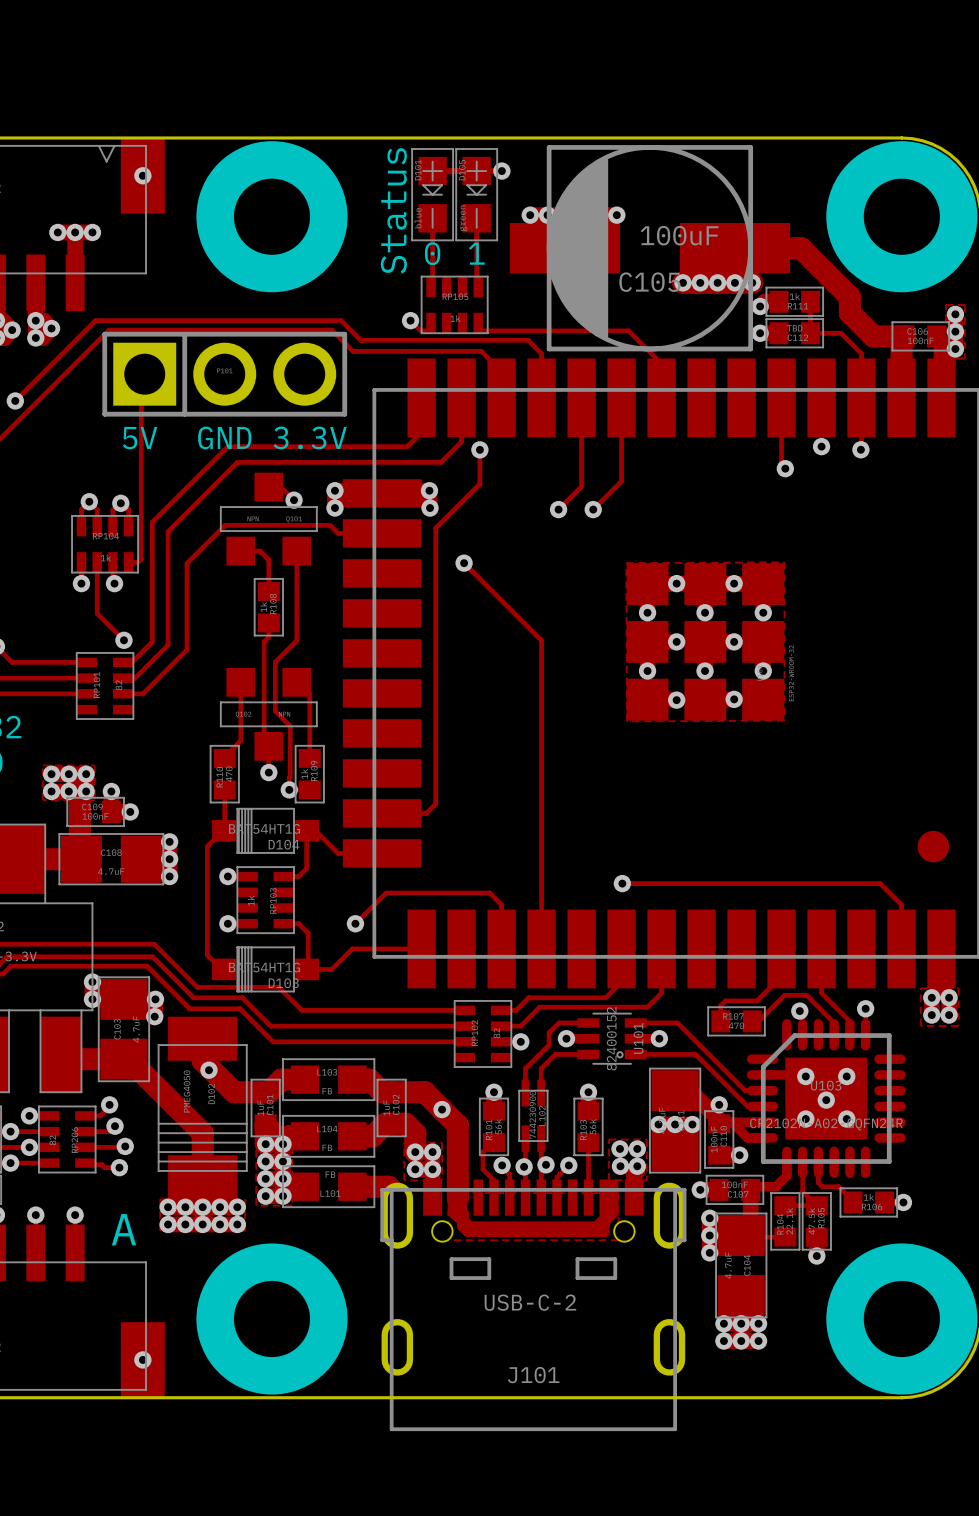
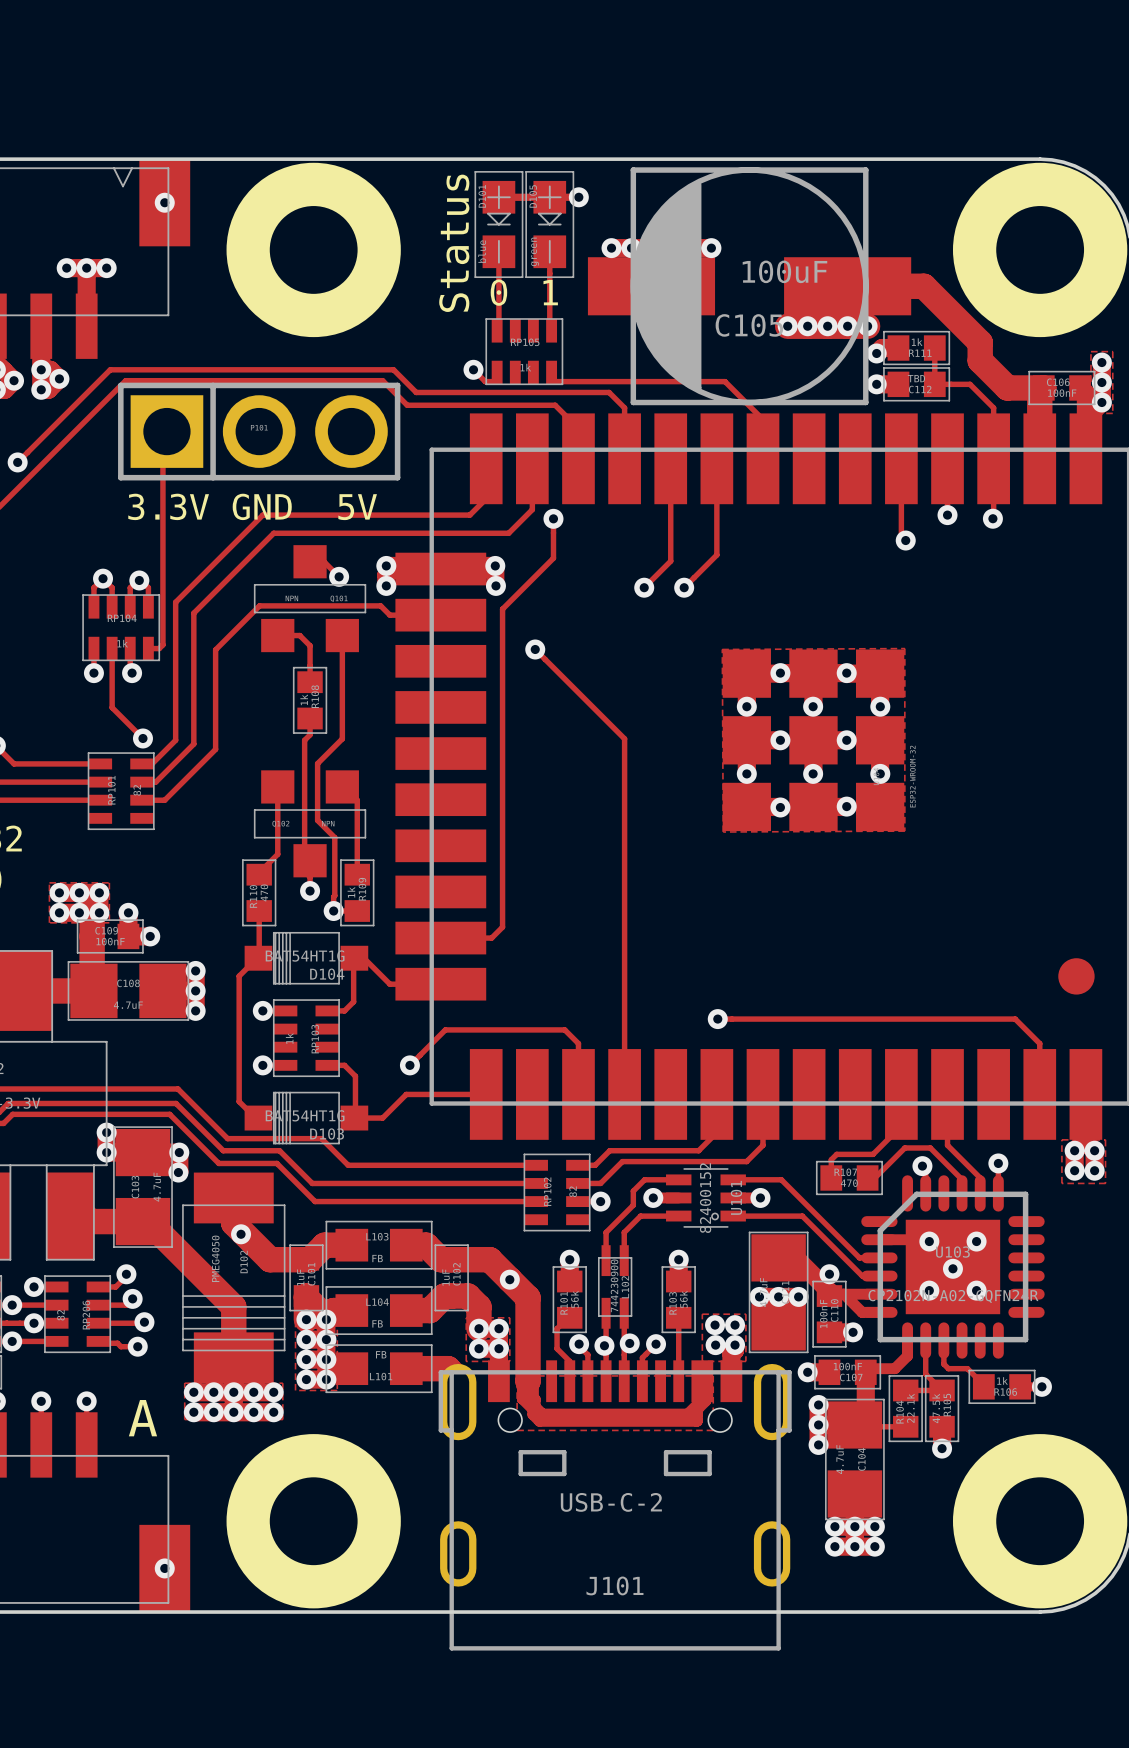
text: 5V GND 3.3V (234, 437) -> 3.3V GND 5V (252, 506)

